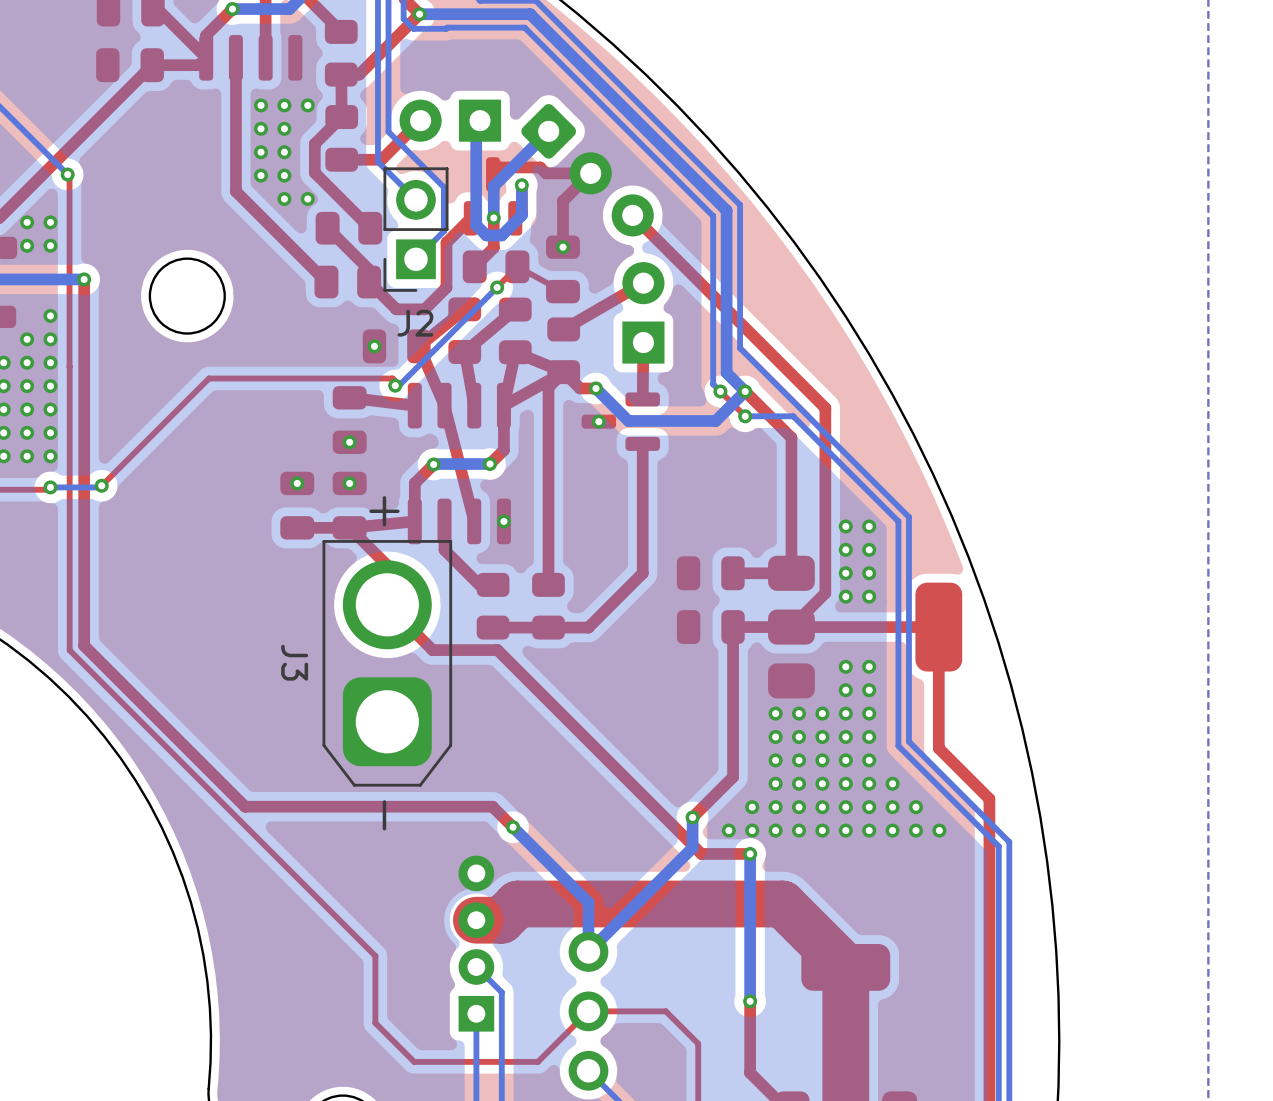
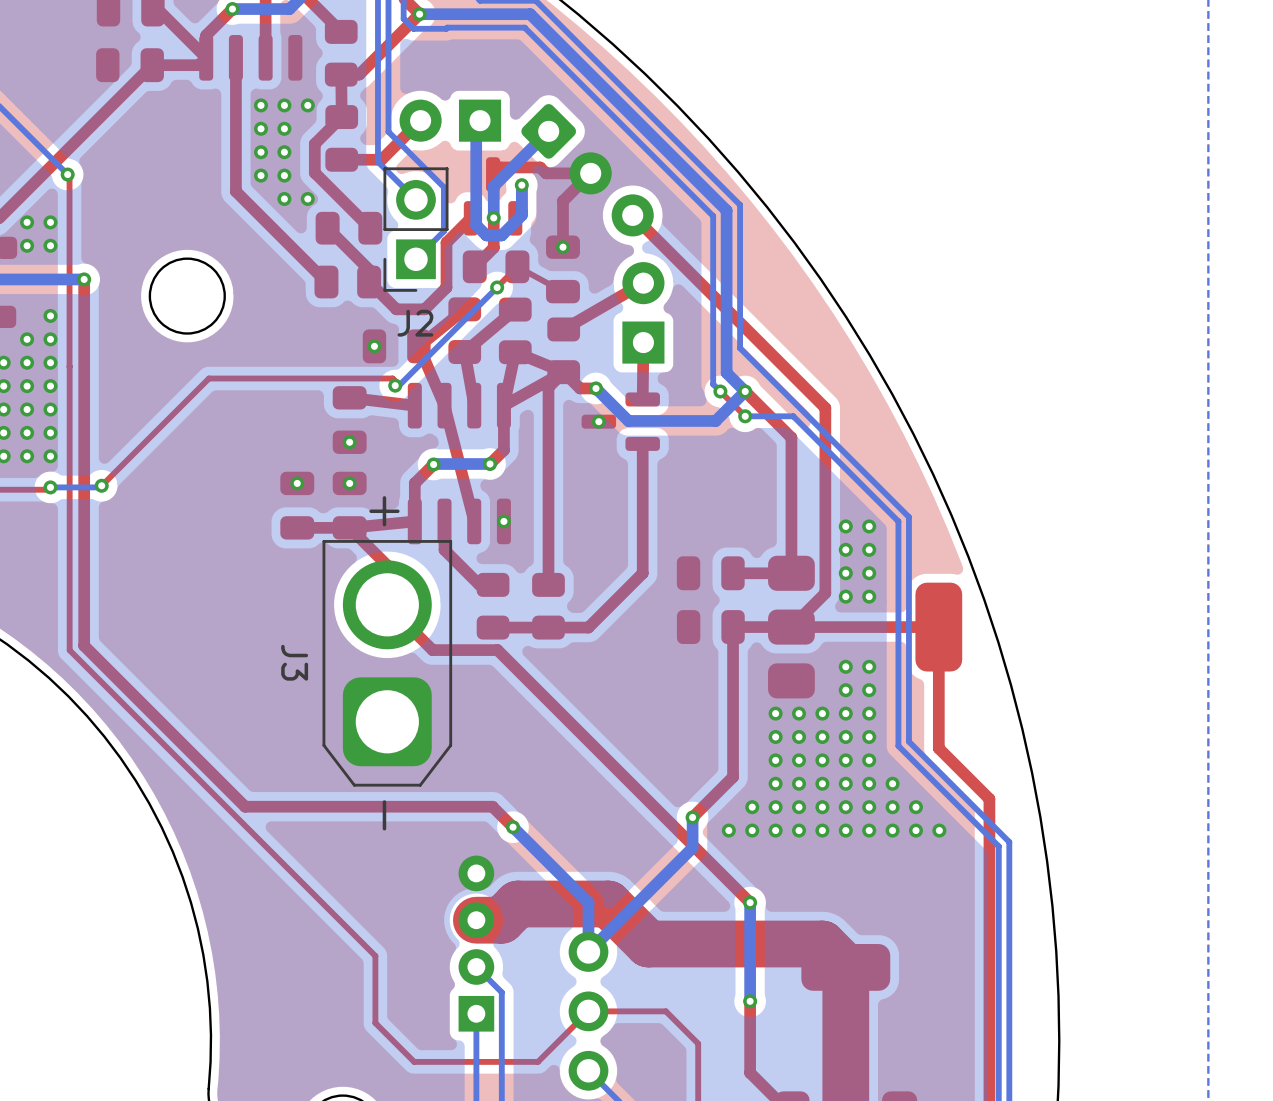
top track: (750, 853) (701, 853) -> (750, 902) (701, 853)
bottom track: (750, 853) (750, 902) -> none
via position: (750, 853) -> (750, 902)
top track: (608, 904) (782, 904) (822, 944) -> (608, 904) (648, 944) (822, 944)

